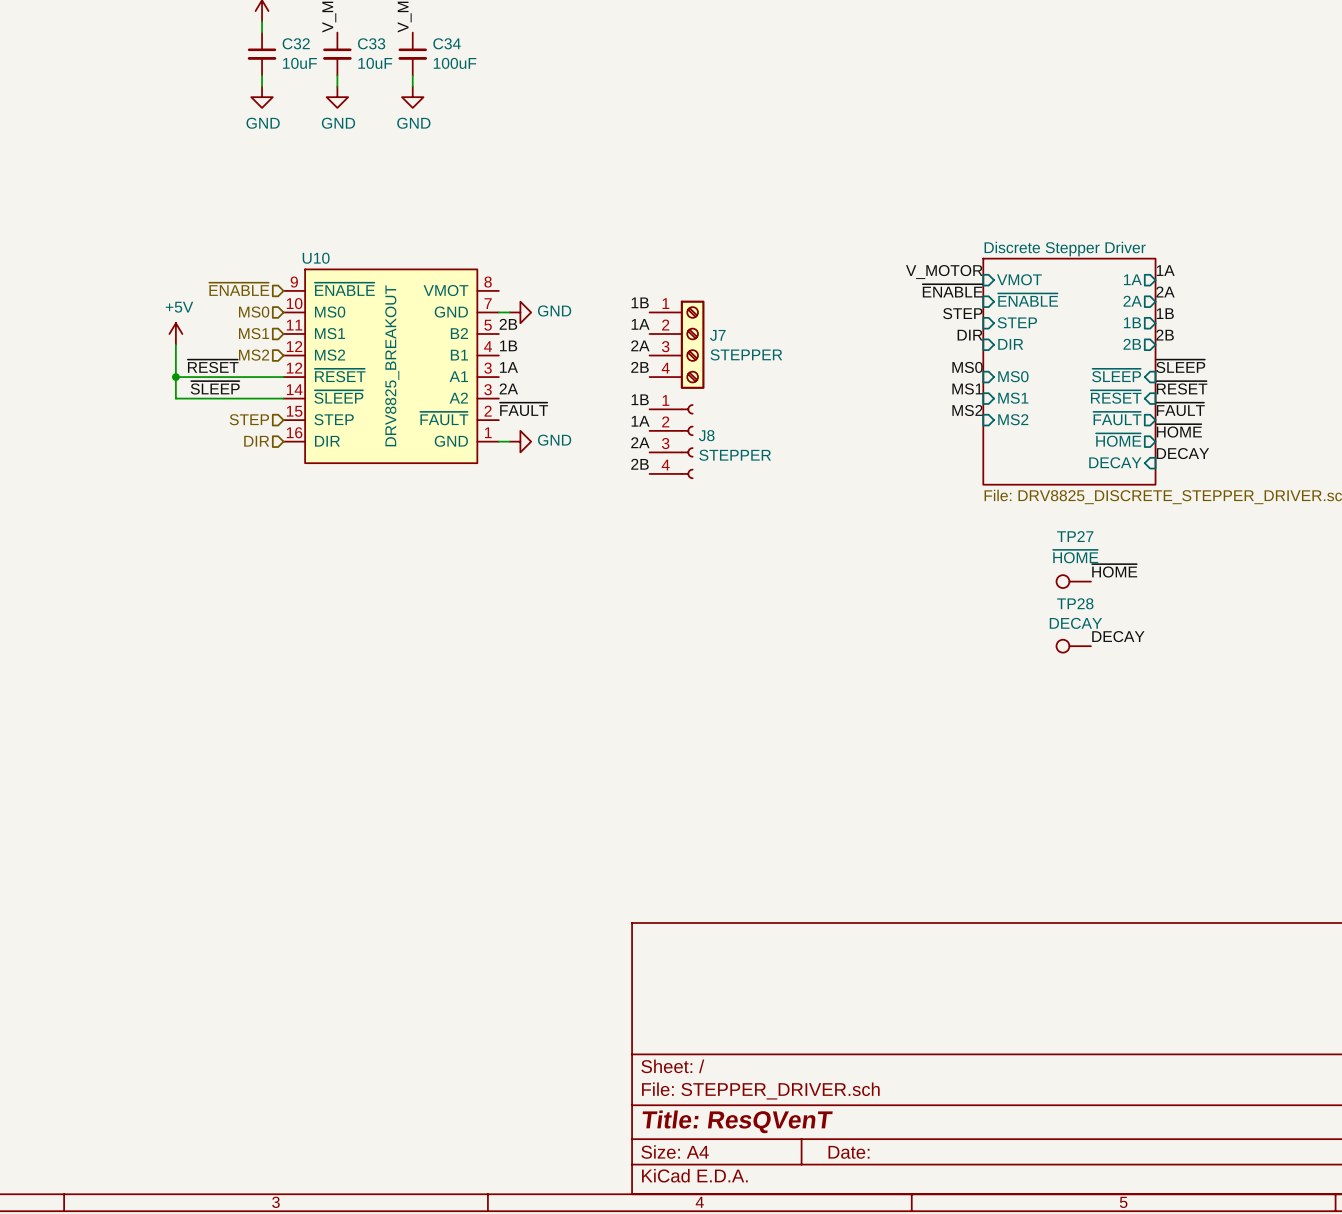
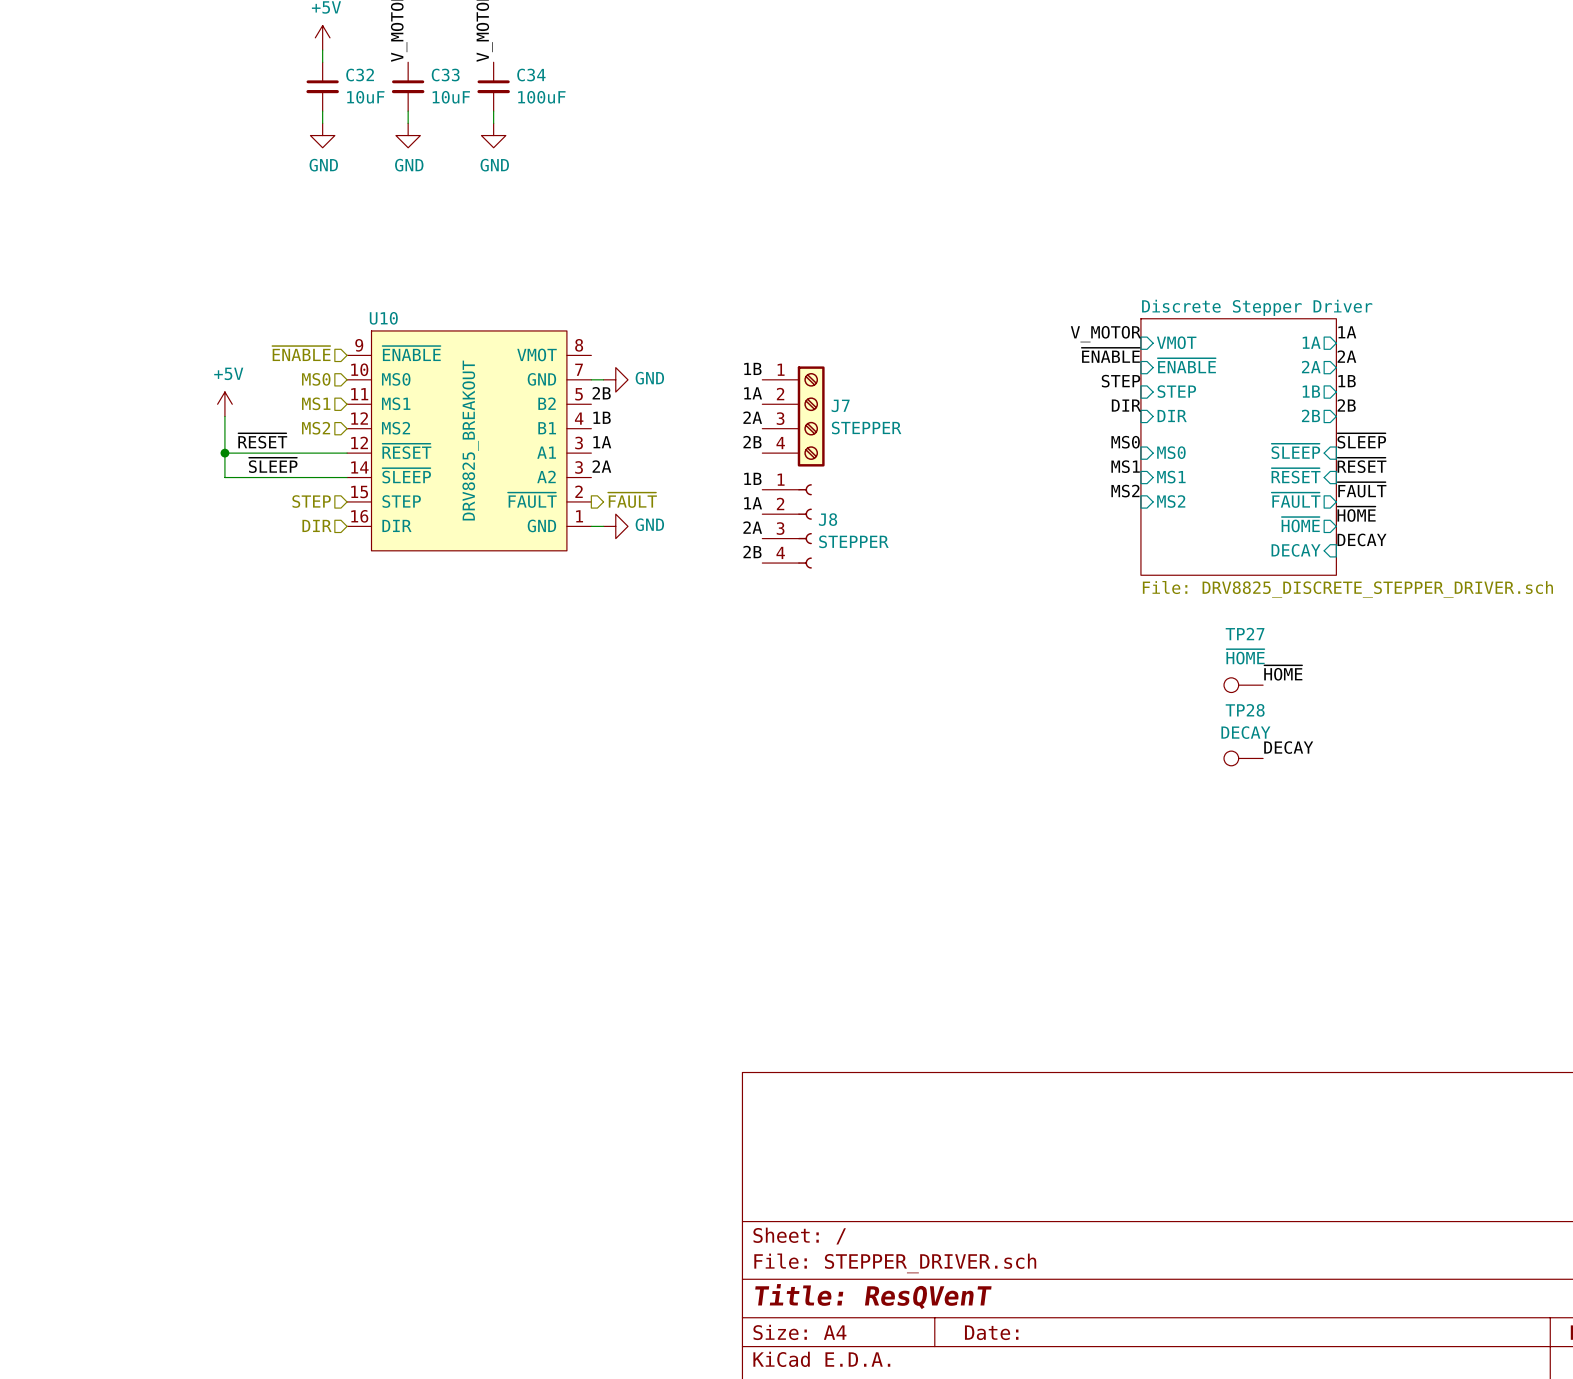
label: ~{FAULT} (524, 409) -> none
hierarchical label: none -> ~{FAULT} (632, 500)

